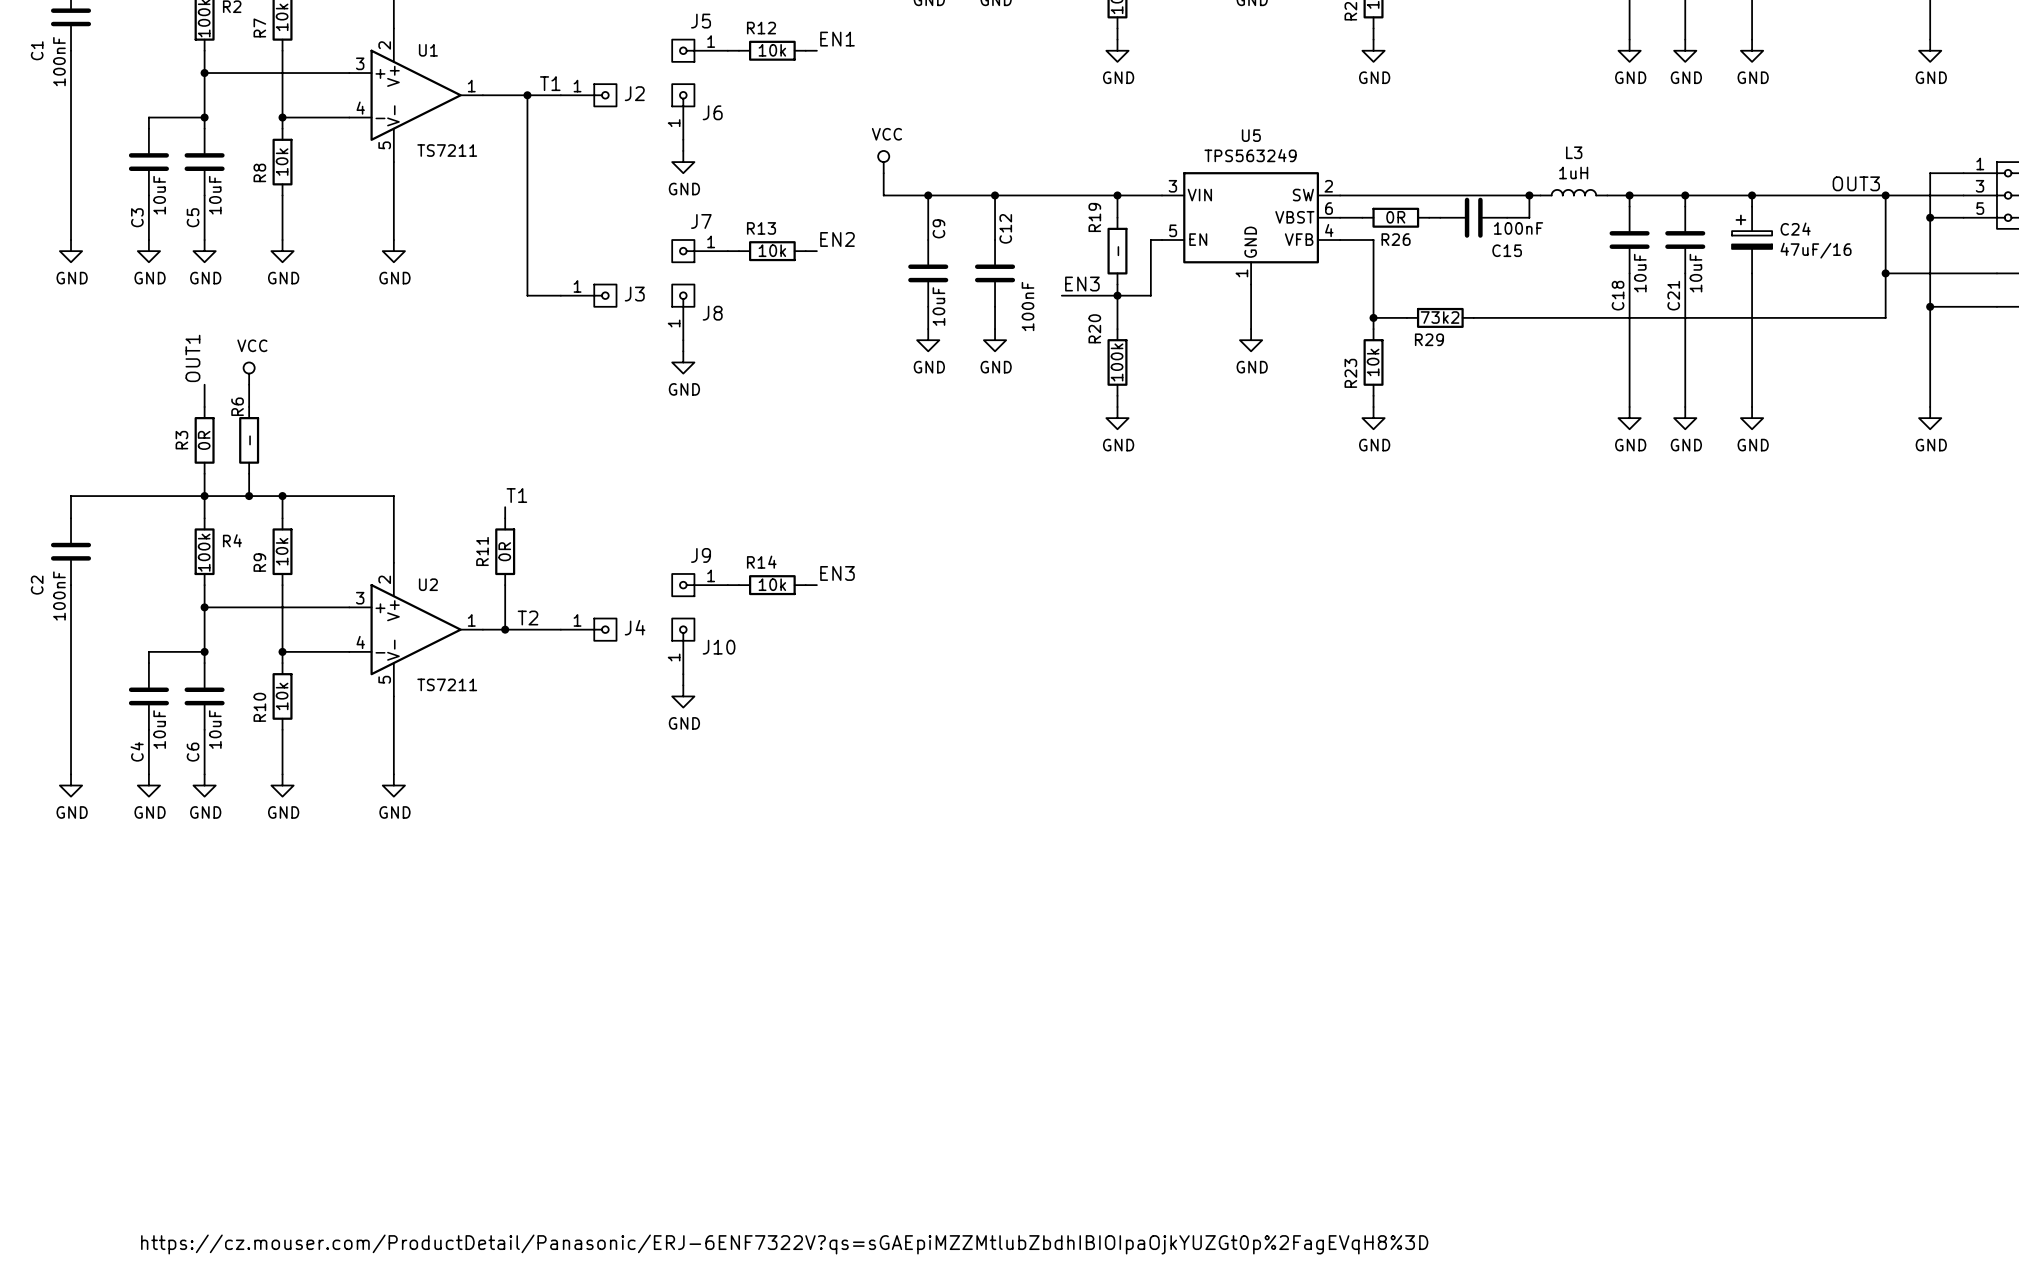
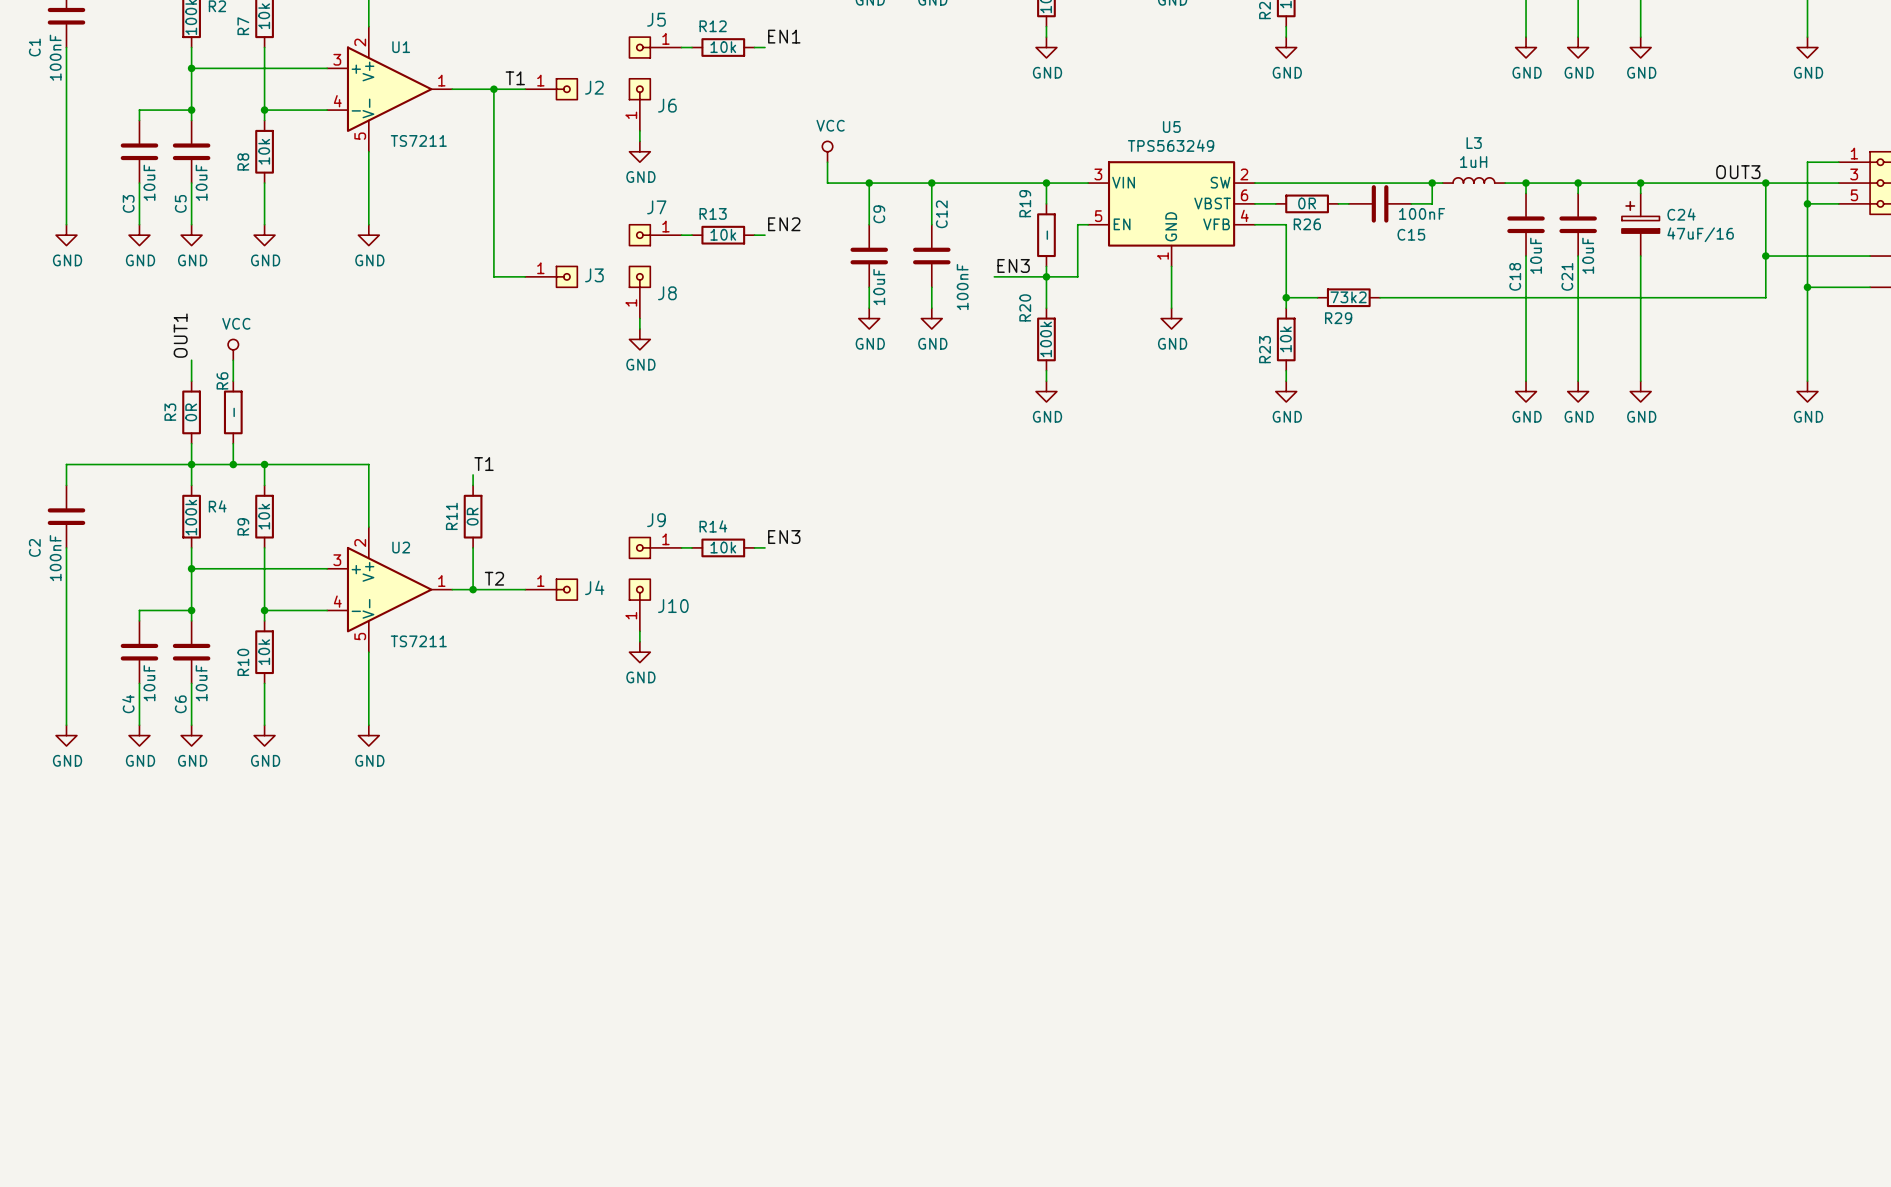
text: https://cz.mouser.com/ProductDetail/Panasonic/ERJ-6ENF7322V?qs=sGAEpiMZZMtlubZbdhIBIOIpaOjkYUZGt0p%2FagEVqH8%3D (784, 1244) -> none

